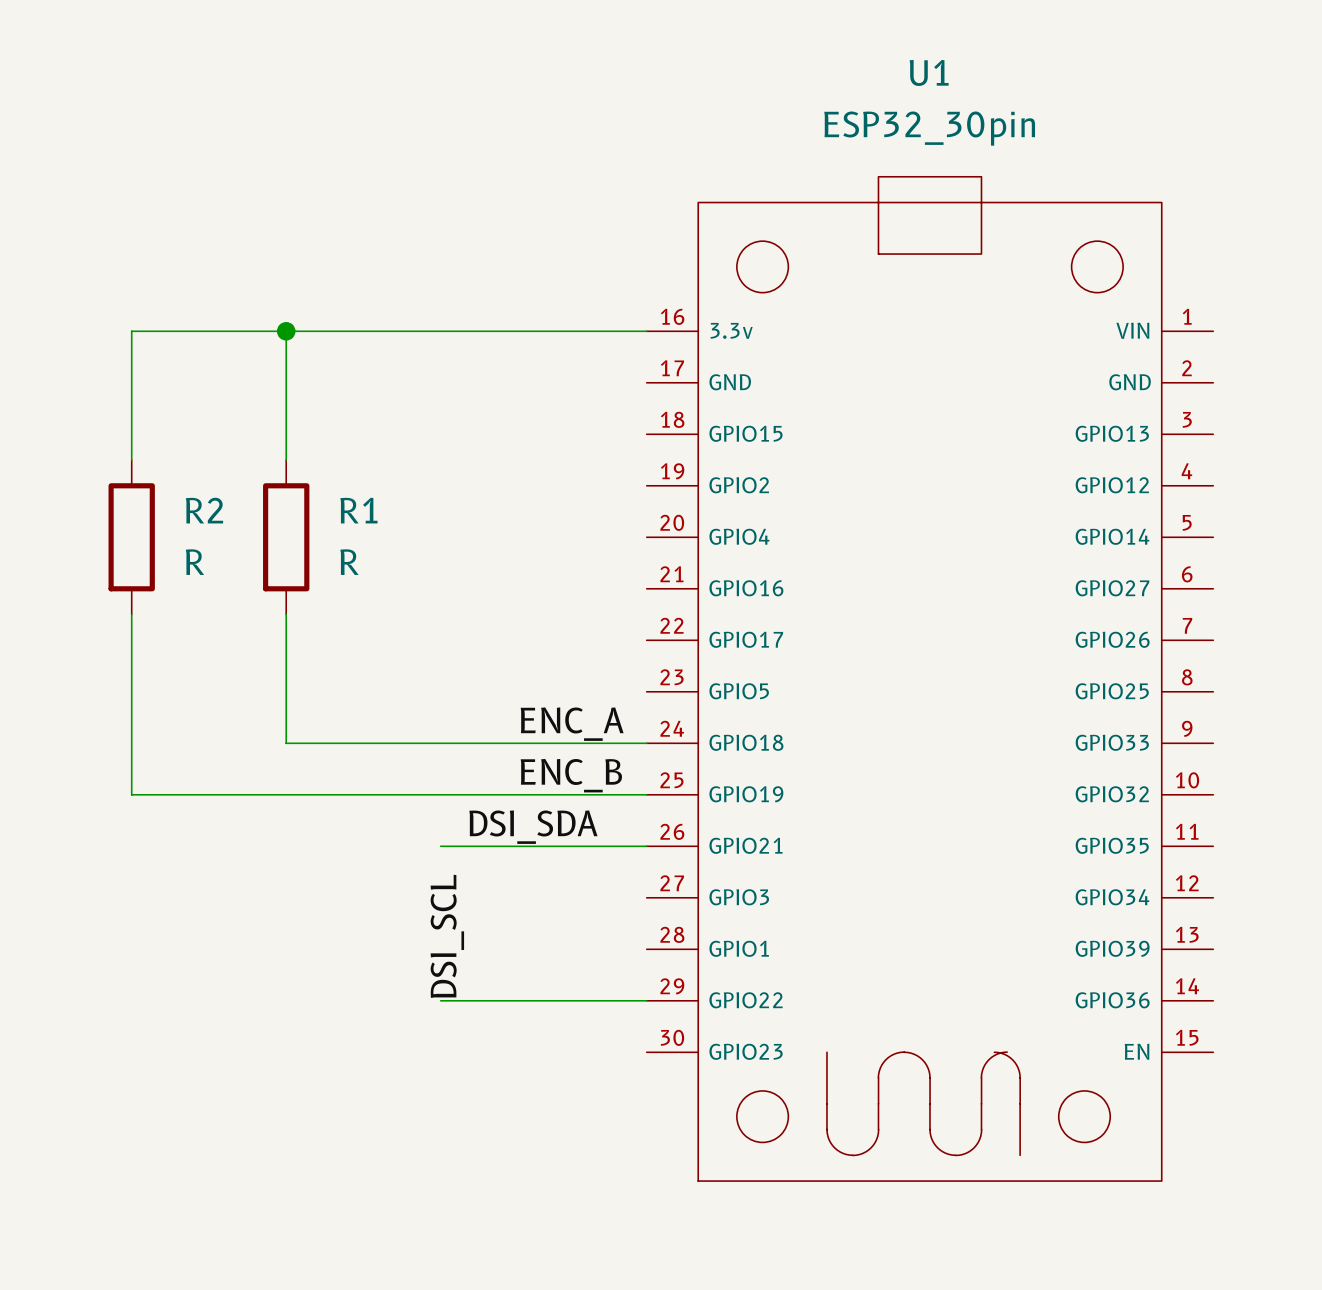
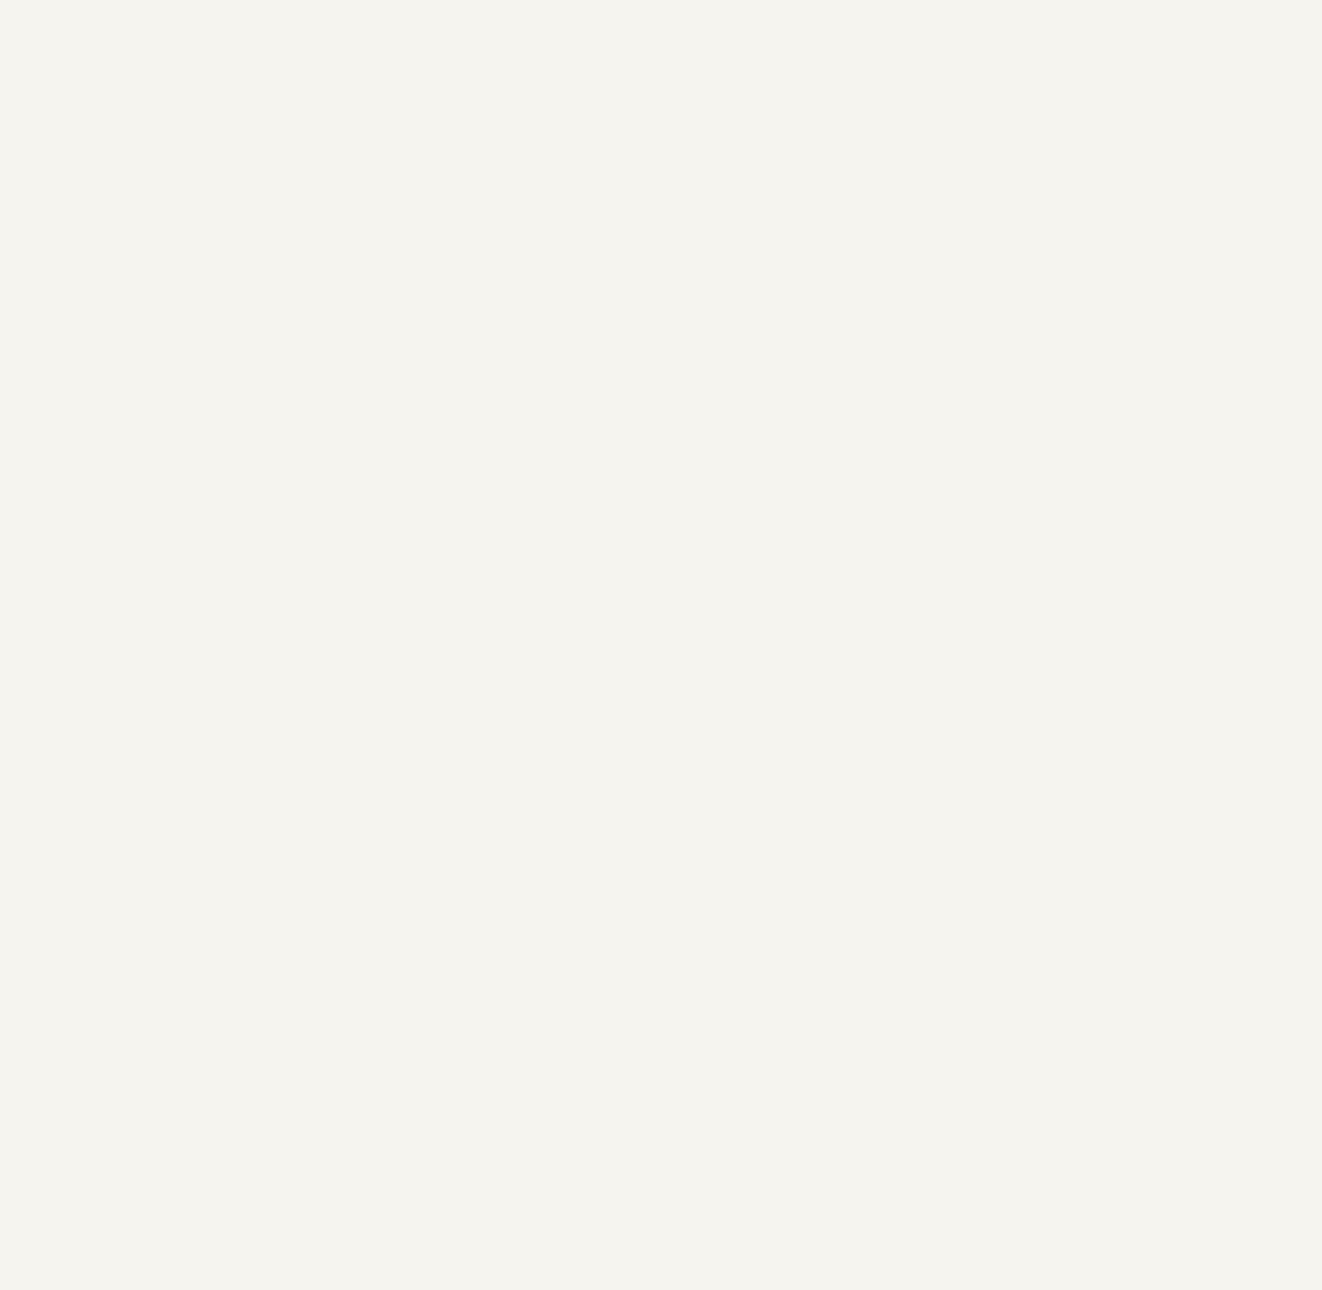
wire: (286, 331) (286, 460) -> none
junction: (286, 331) -> none
wire: (646, 331) (131, 331) (131, 460) -> none
R2: R (131, 537) -> none
R1: R (286, 537) -> none
wire: (131, 614) (131, 794) (646, 794) -> none
wire: (286, 614) (286, 743) (646, 743) -> none
U1: (929, 678) -> none
label: ENC_A (572, 724) -> none
label: ENC_B (571, 775) -> none
label: DSI_SDA (533, 827) -> none
wire: (440, 846) (646, 846) -> none
label: DSI_SCL (447, 936) -> none
wire: (440, 1000) (646, 1000) -> none

